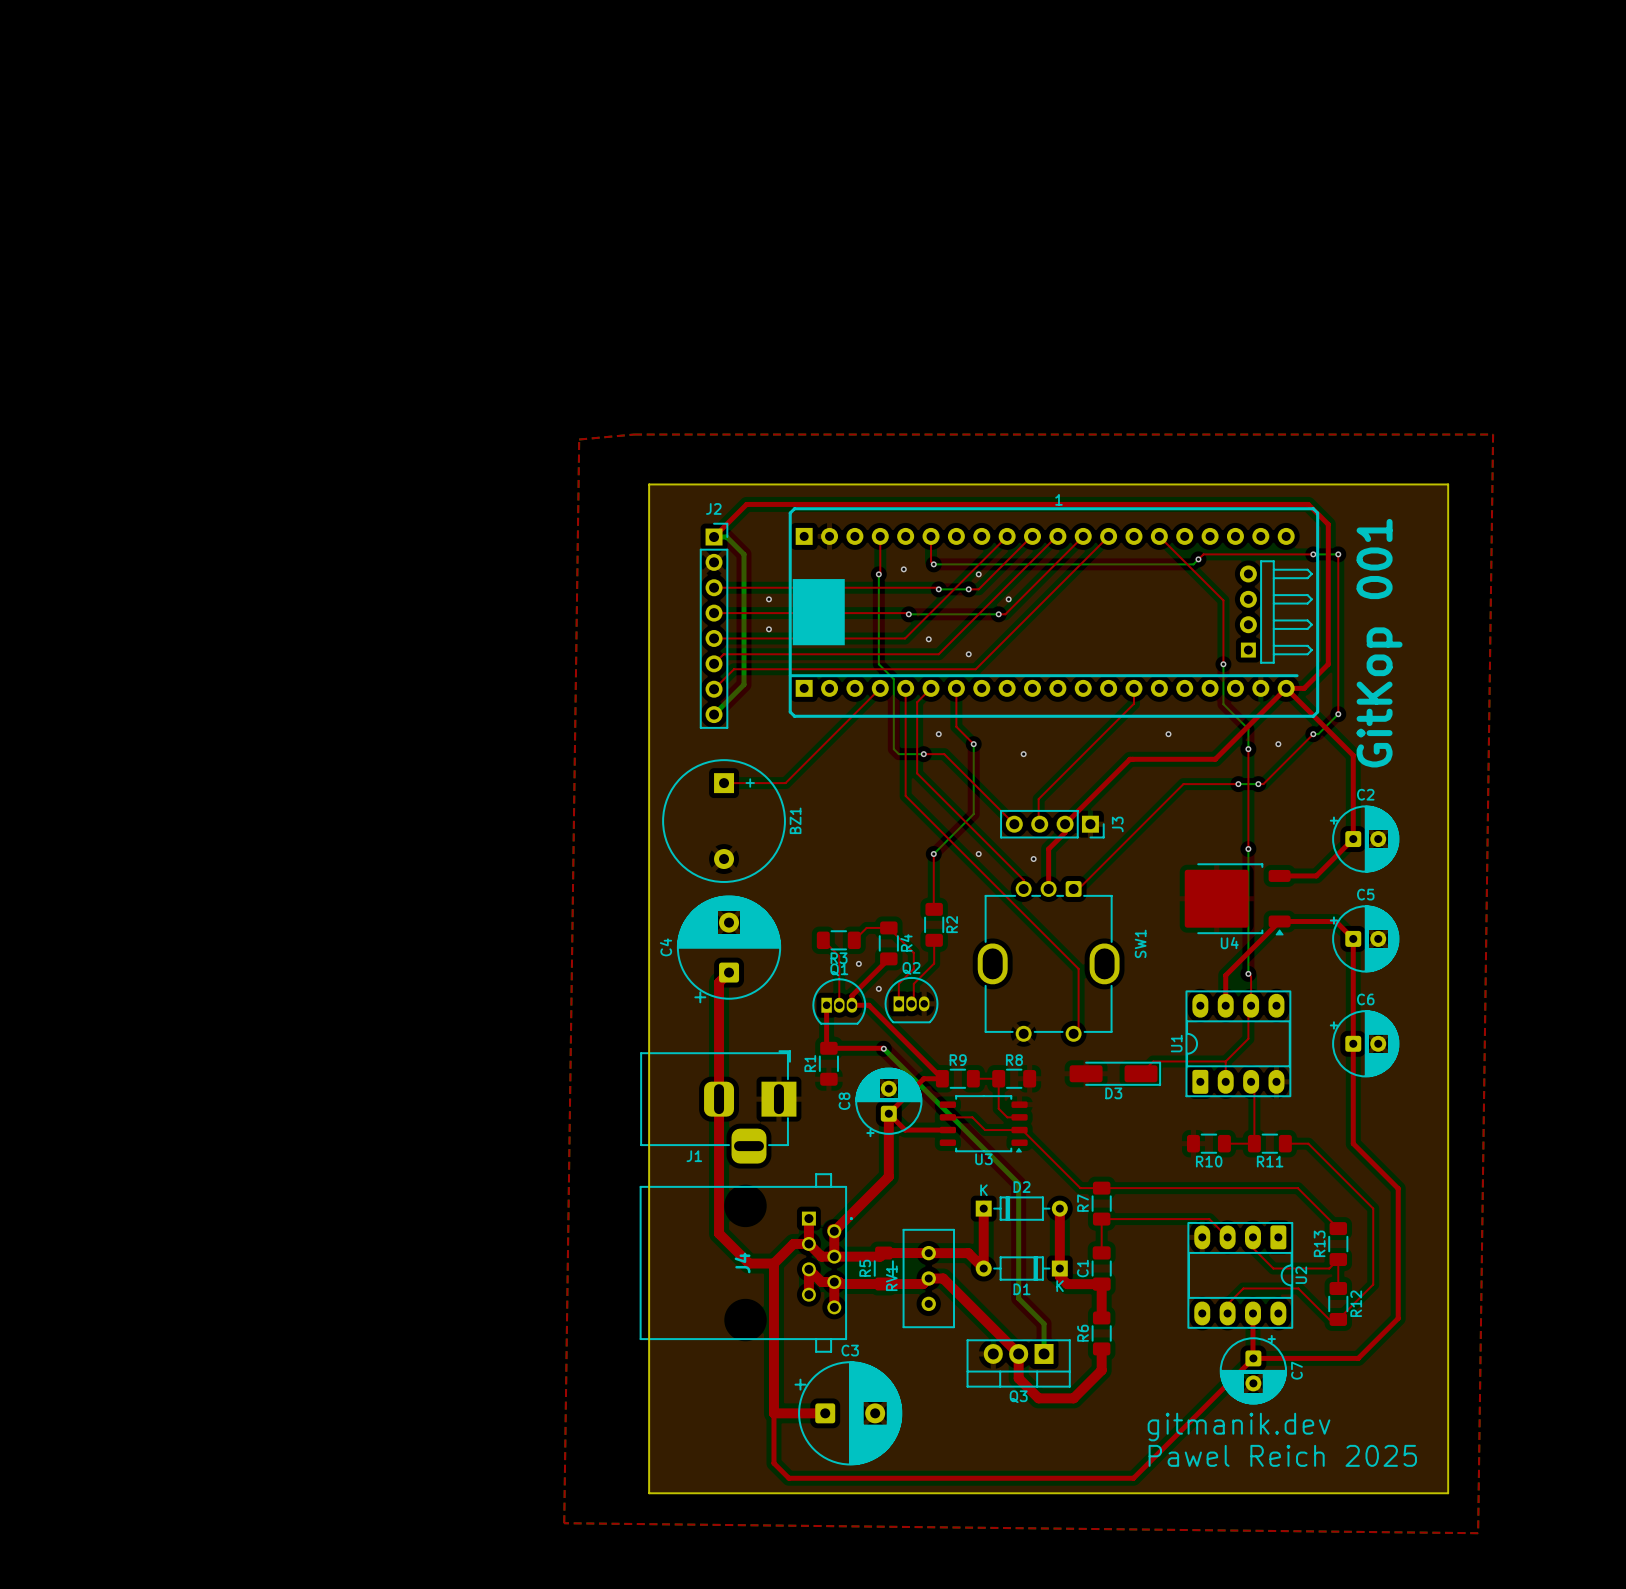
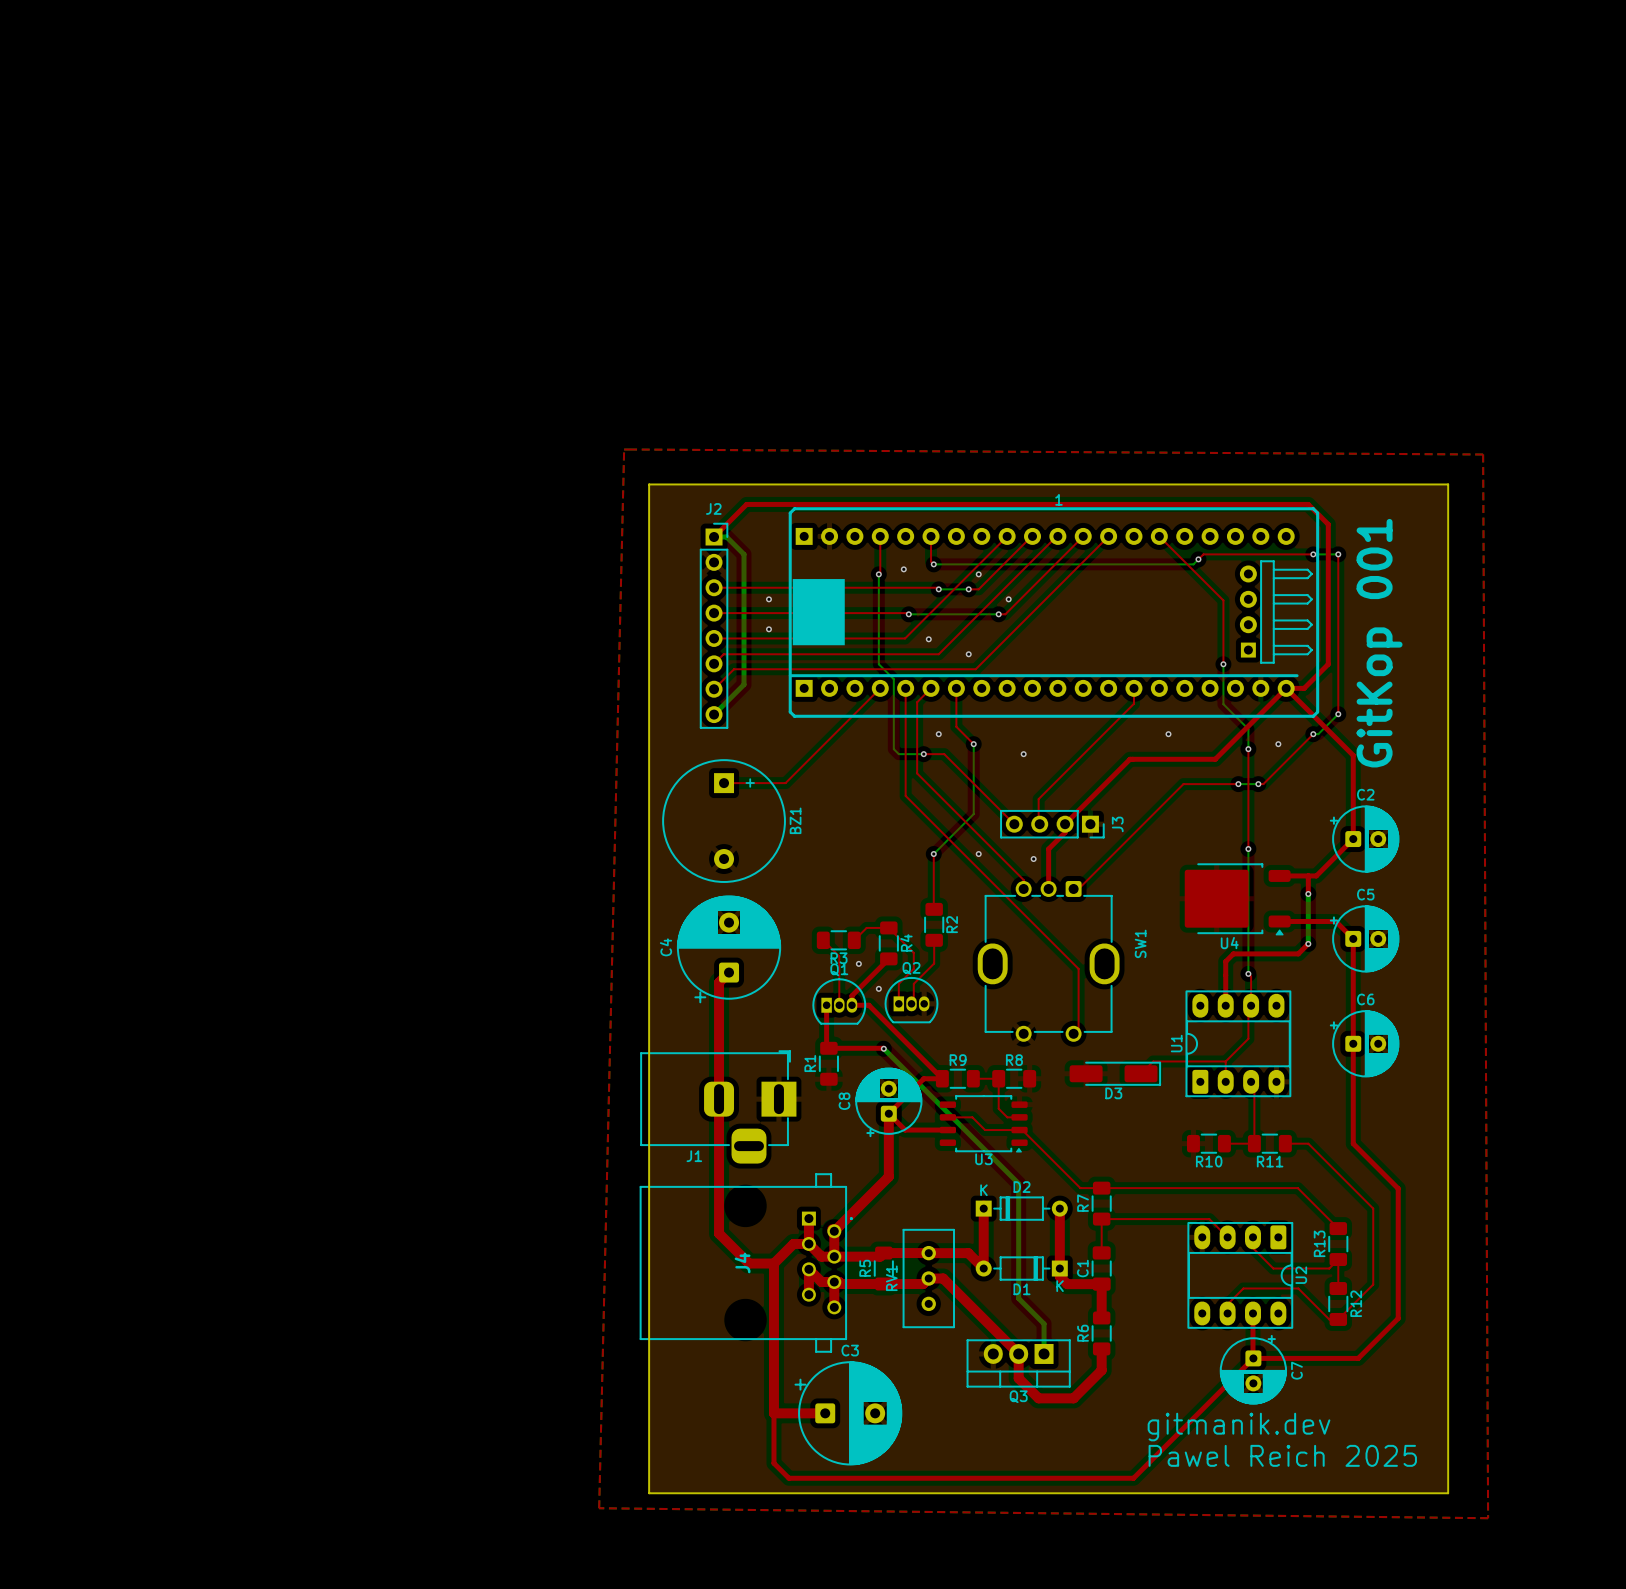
top zone outline: (634, 434) (1493, 434) (1478, 1533) (564, 1523) (579, 439) (634, 434) -> (624, 449) (599, 1508) (1488, 1518) (1483, 454) (624, 449)
top track: none -> (1308, 875) (1308, 893)
bottom track: none -> (1308, 893) (1308, 943)
via: none -> (1308, 893)
top track: (1279, 921) (1225, 975) -> (1307, 943) (1298, 953) (1233, 953) (1225, 961) (1225, 975)
via: none -> (1308, 943)

